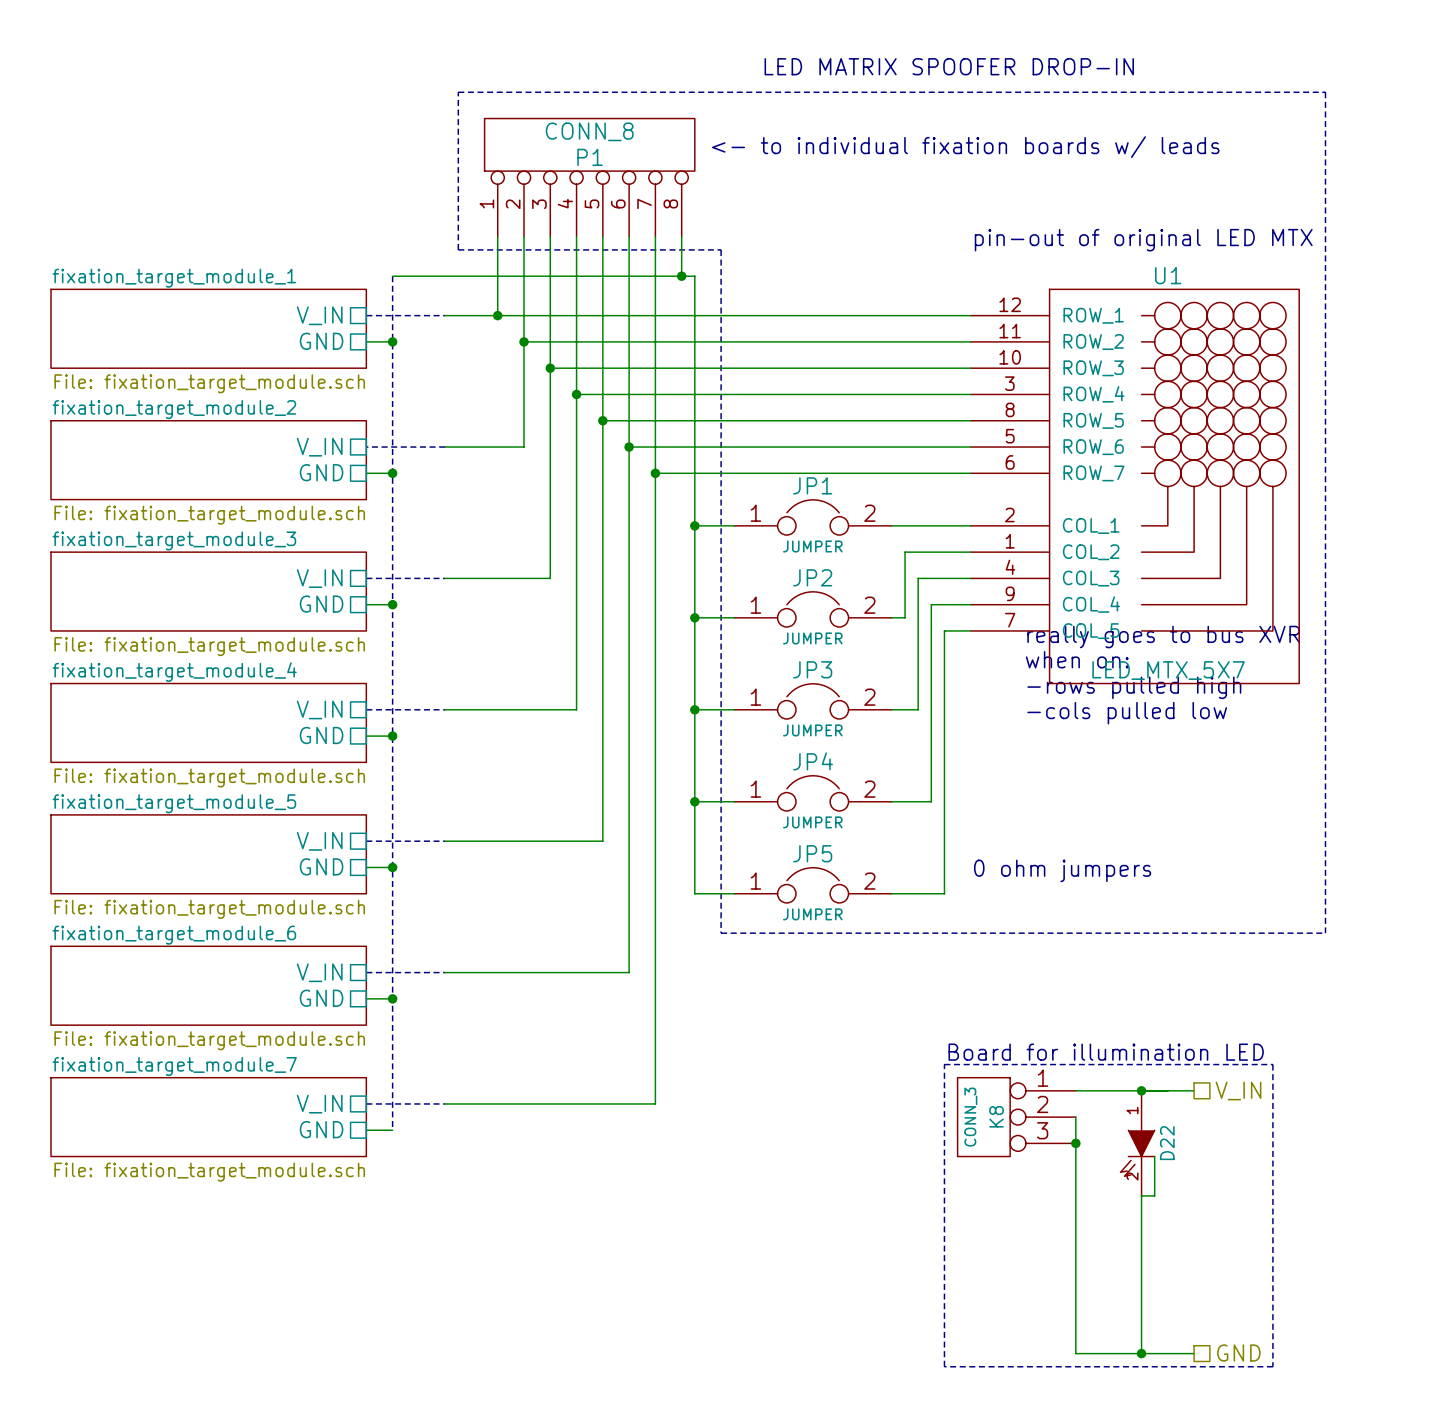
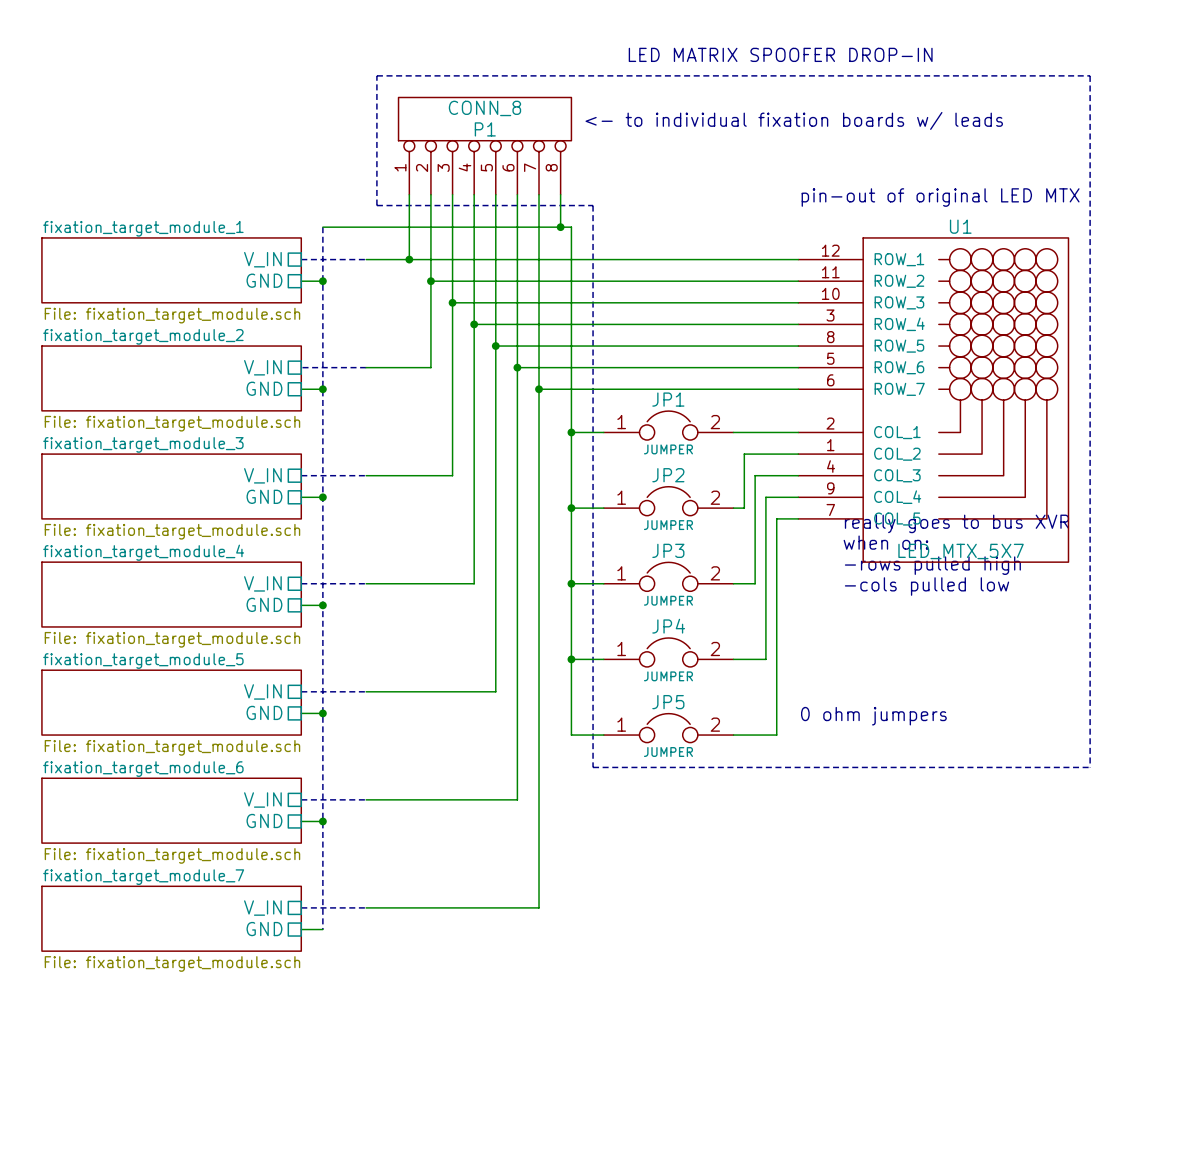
text: Board for illumination LED (1106, 1052) -> none
line: (944, 1064) (1272, 1064) (1272, 1366) (944, 1366) (944, 1064) -> none
wire: (1075, 1090) (1194, 1090) -> none
junction: (1141, 1090) -> none
hierarchical label: V_IN (1238, 1091) -> none
K8: CONN_3 (1016, 1117) -> none
wire: (1075, 1117) (1075, 1353) (1194, 1353) -> none
junction: (1075, 1143) -> none
D22: (1137, 1143) -> none
wire: (1154, 1156) (1154, 1195) (1141, 1195) (1141, 1353) -> none
junction: (1141, 1353) -> none
hierarchical label: GND (1238, 1353) -> none

